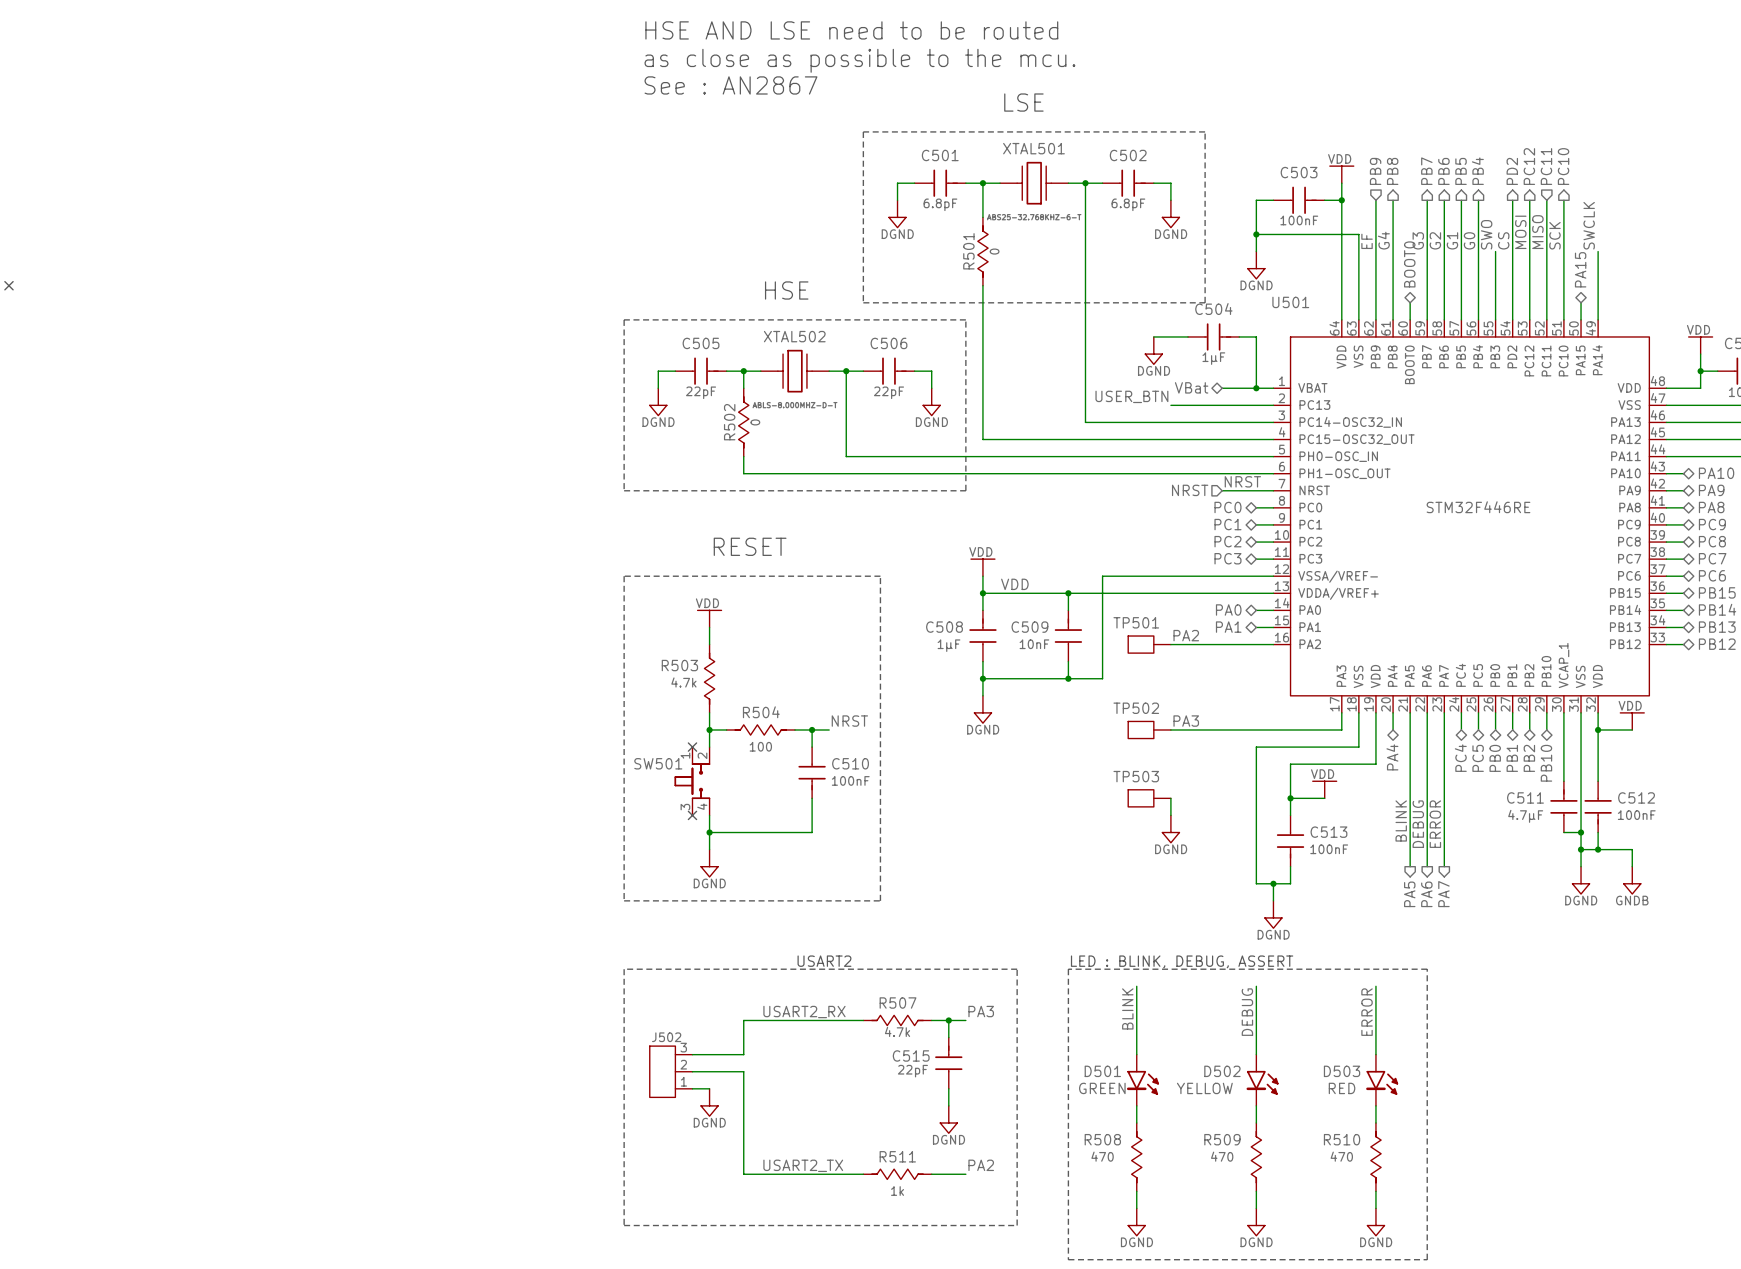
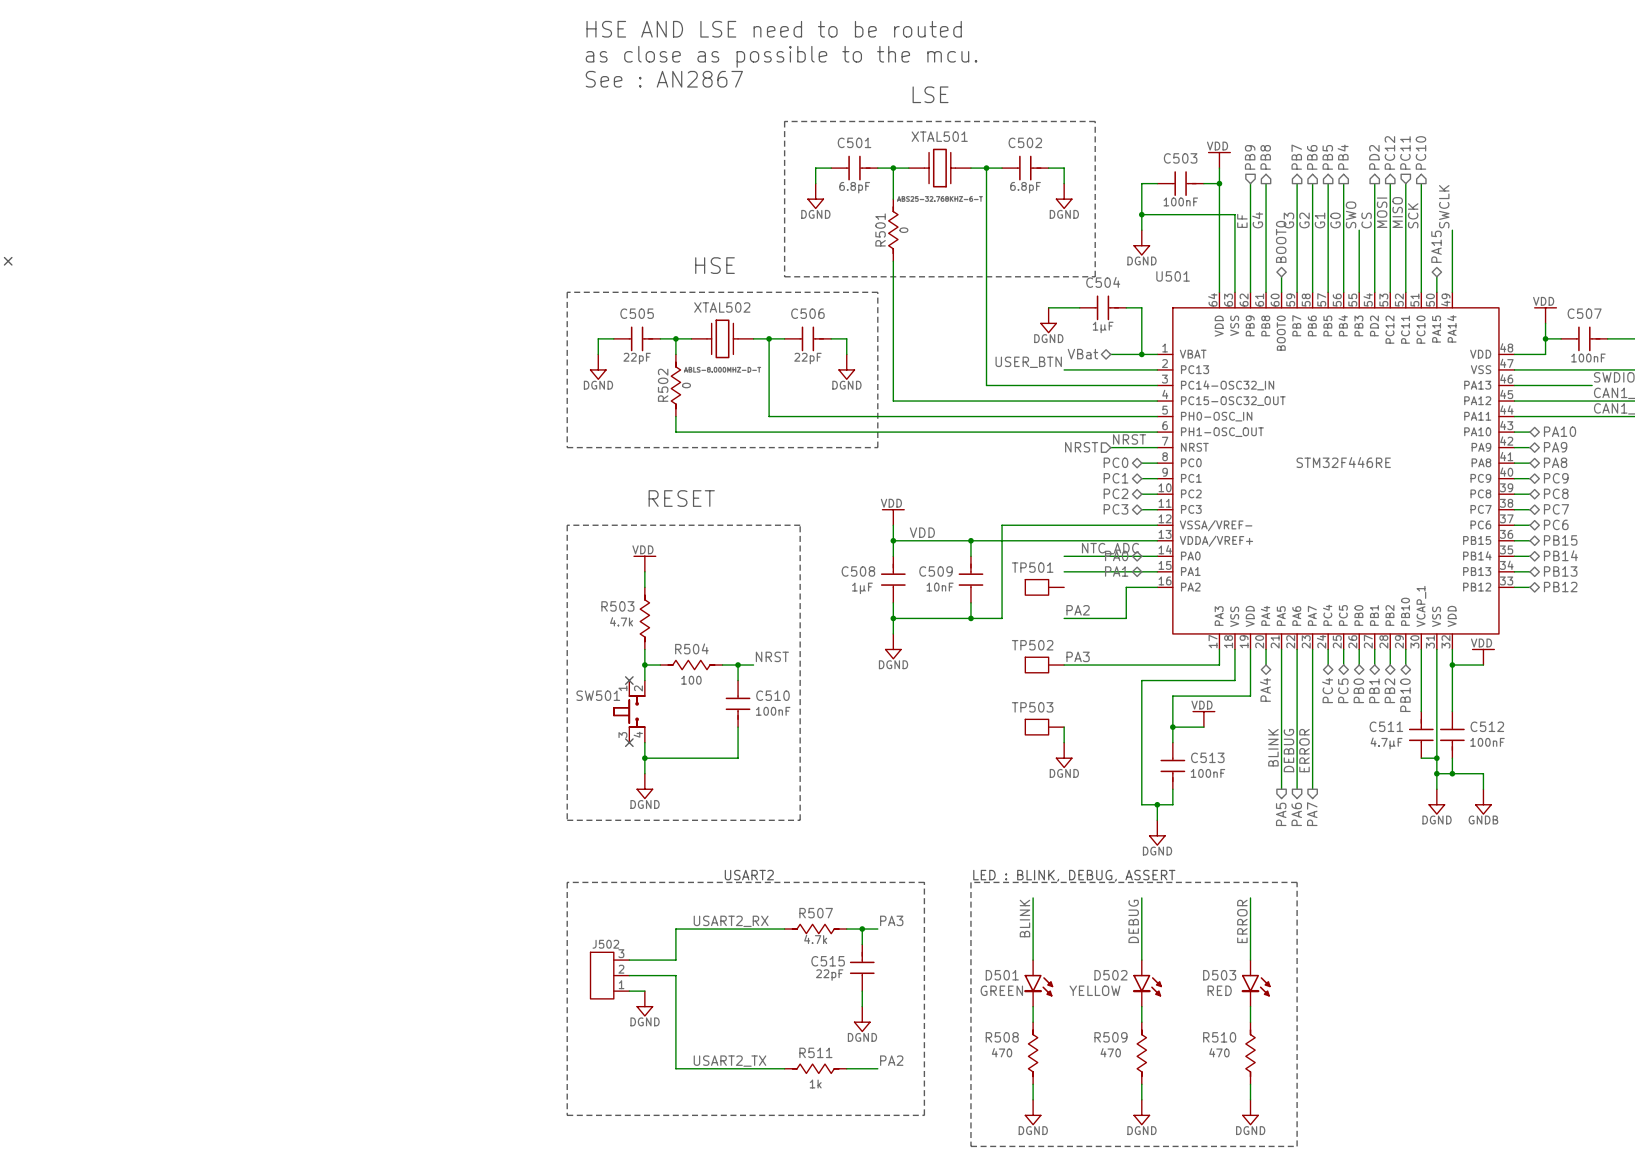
label: none -> NTC_ADC (1110, 548)
wire: none -> (1064, 556) (1141, 556)
wire: none -> (1064, 571) (1141, 571)
label position: PA2 (1186, 635) -> PA2 (1078, 610)
wire: (1170, 644) (1239, 644) -> (1064, 618) (1126, 618) (1126, 587)

